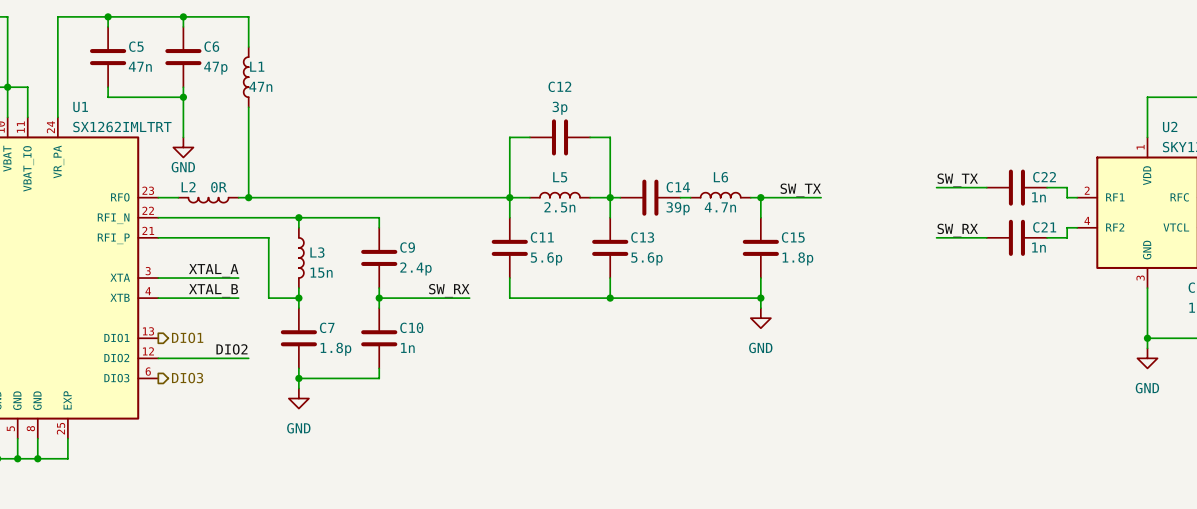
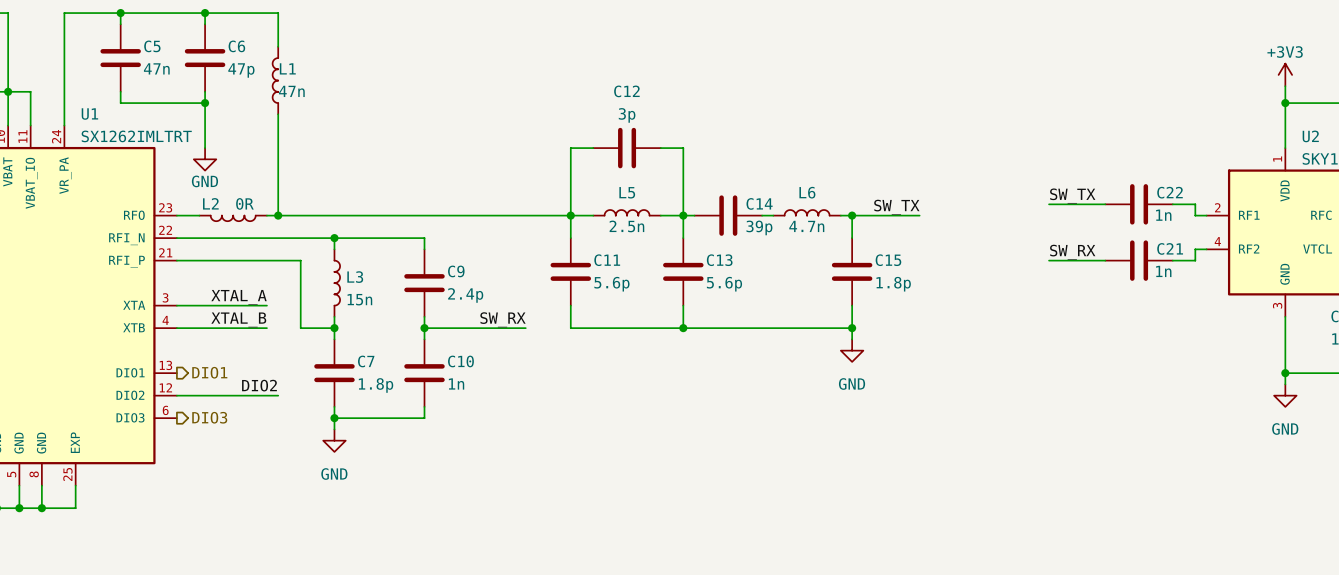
power symbol: none -> +3V3 (1285, 74)
wire: none -> (1285, 86) (1285, 103)
junction: none -> (1285, 103)

